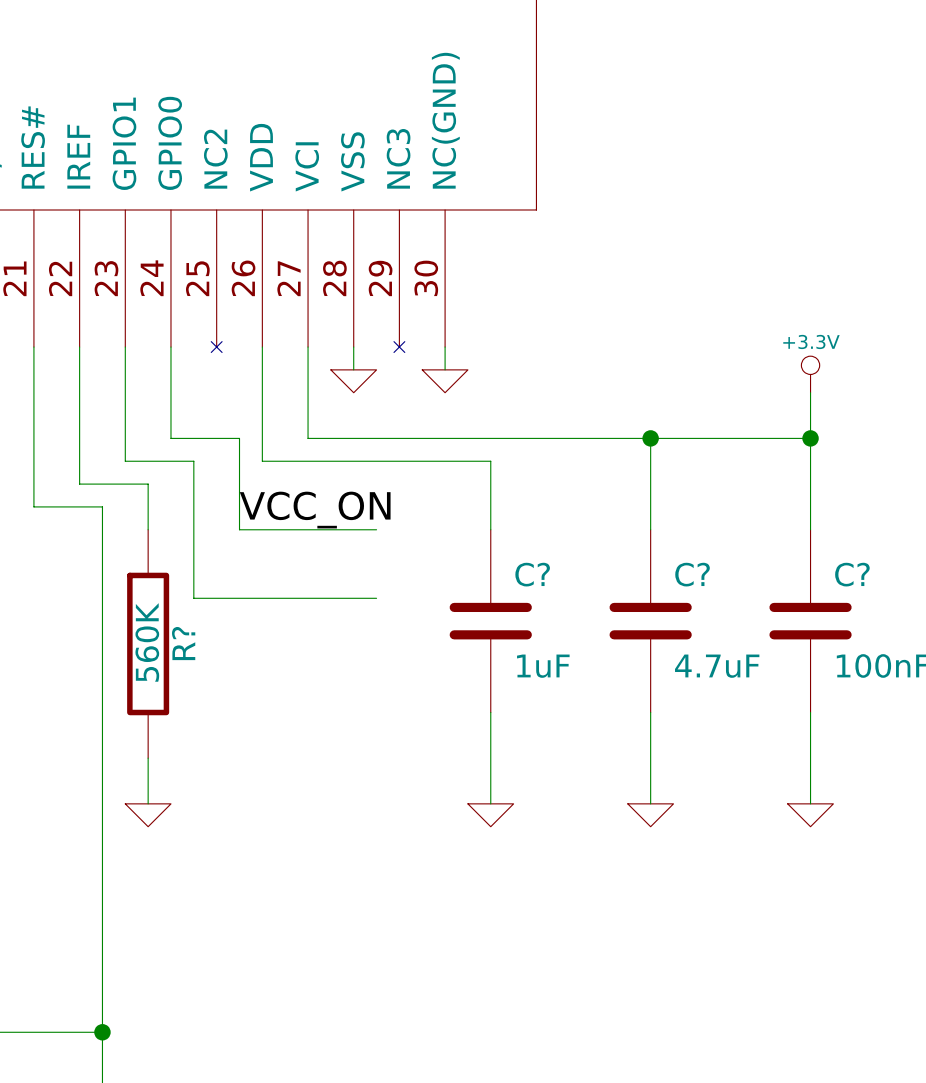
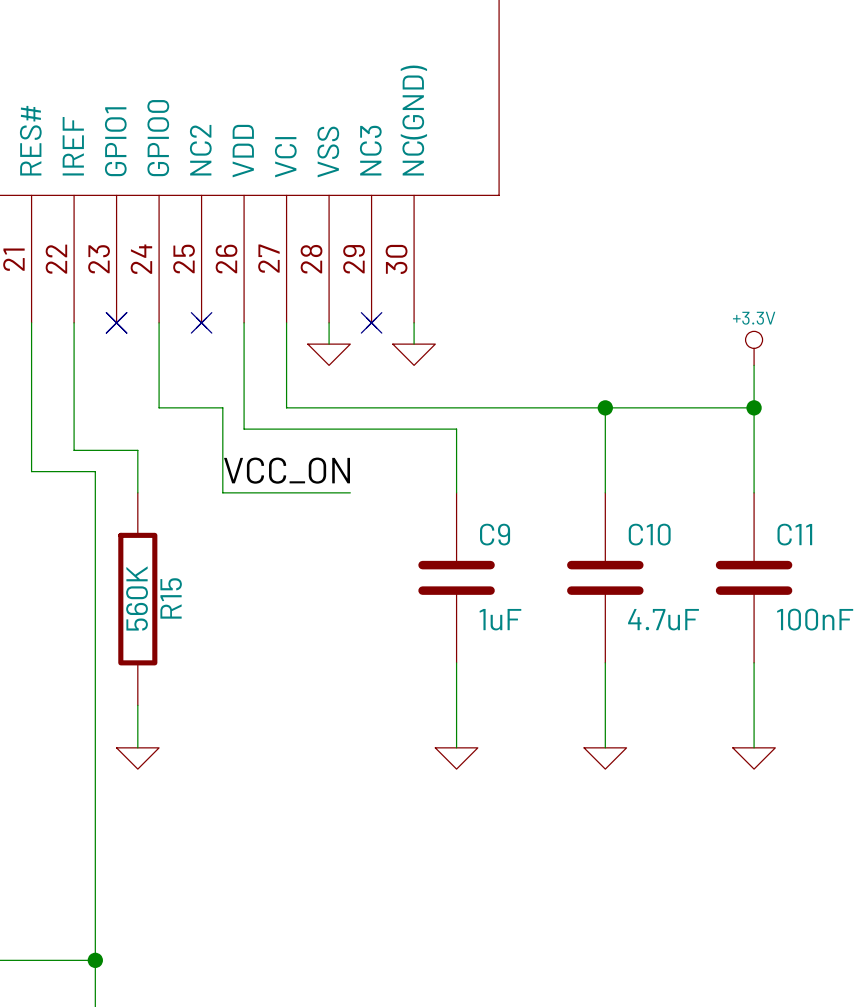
wire: (125, 347) (125, 461) (193, 461) (193, 598) (376, 598) -> none
no-connect mark: none -> (116, 322)
no-connect mark: none -> (201, 322)
no-connect mark: none -> (371, 322)
C? name: C? (532, 574) -> C9 (495, 534)
C? name: C? (692, 574) -> C10 (649, 534)
C? name: C? (852, 574) -> C11 (794, 534)
R? name: R? (183, 643) -> R15 (171, 598)

